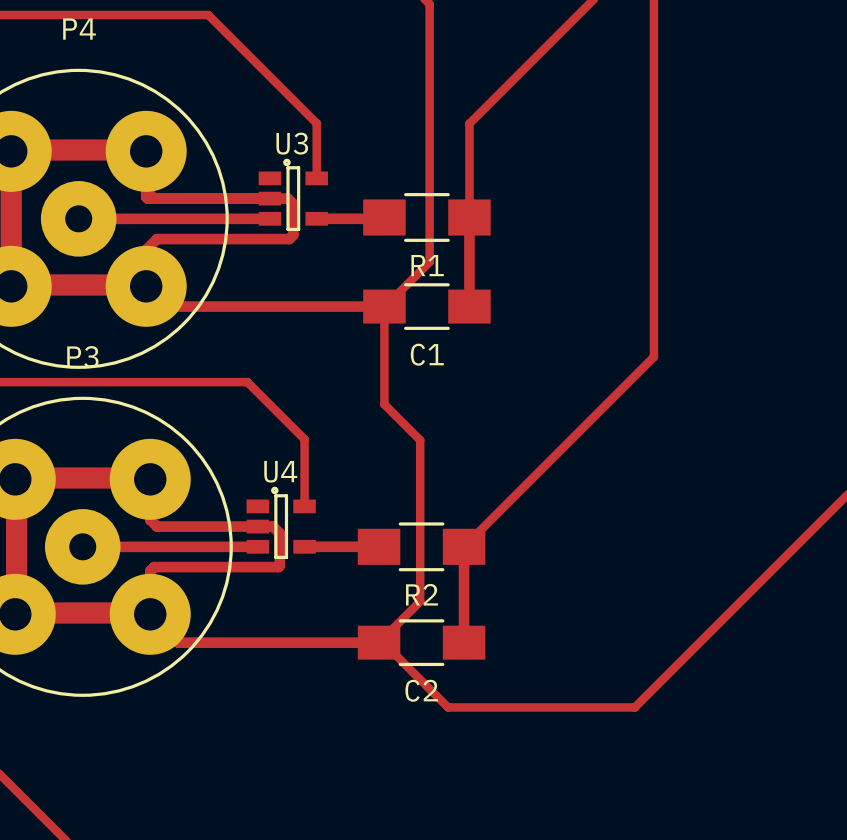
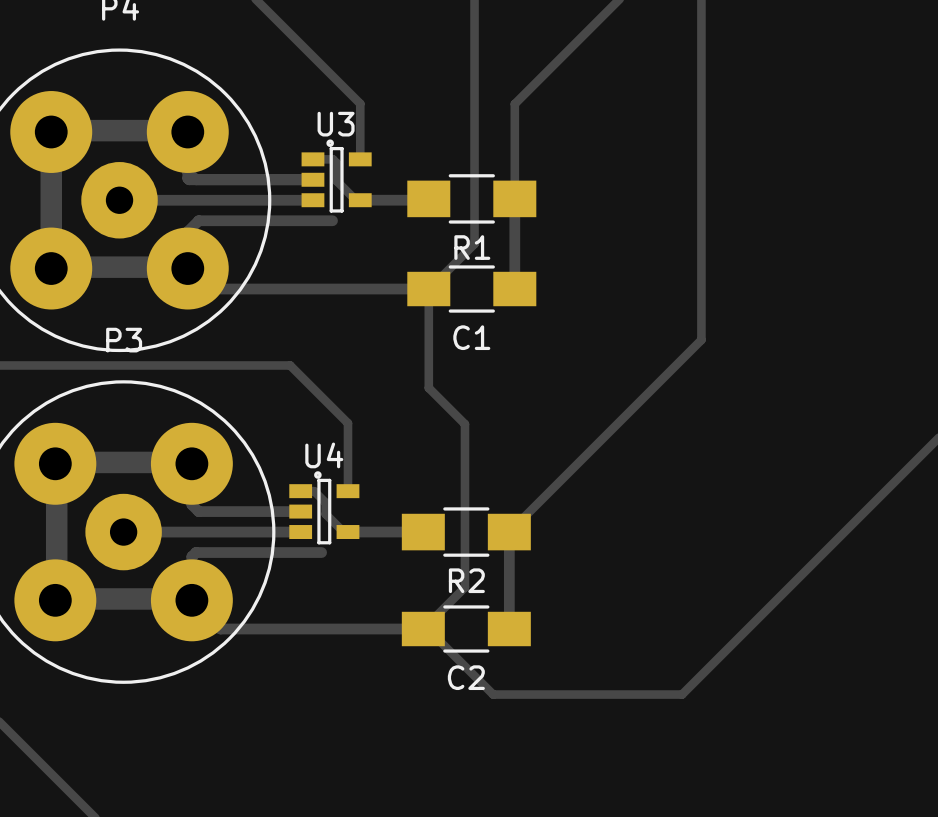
track: none -> (312, 159) (332, 159) (336, 163) (336, 180) (355, 200) (360, 200)
track: (269, 198) (287, 198) (293, 203) (293, 235) (289, 239) -> none
track: none -> (300, 491) (314, 491) (325, 502) (325, 514) (343, 532) (347, 532)
track: (257, 526) (273, 526) (279, 533) (278, 567) -> none

